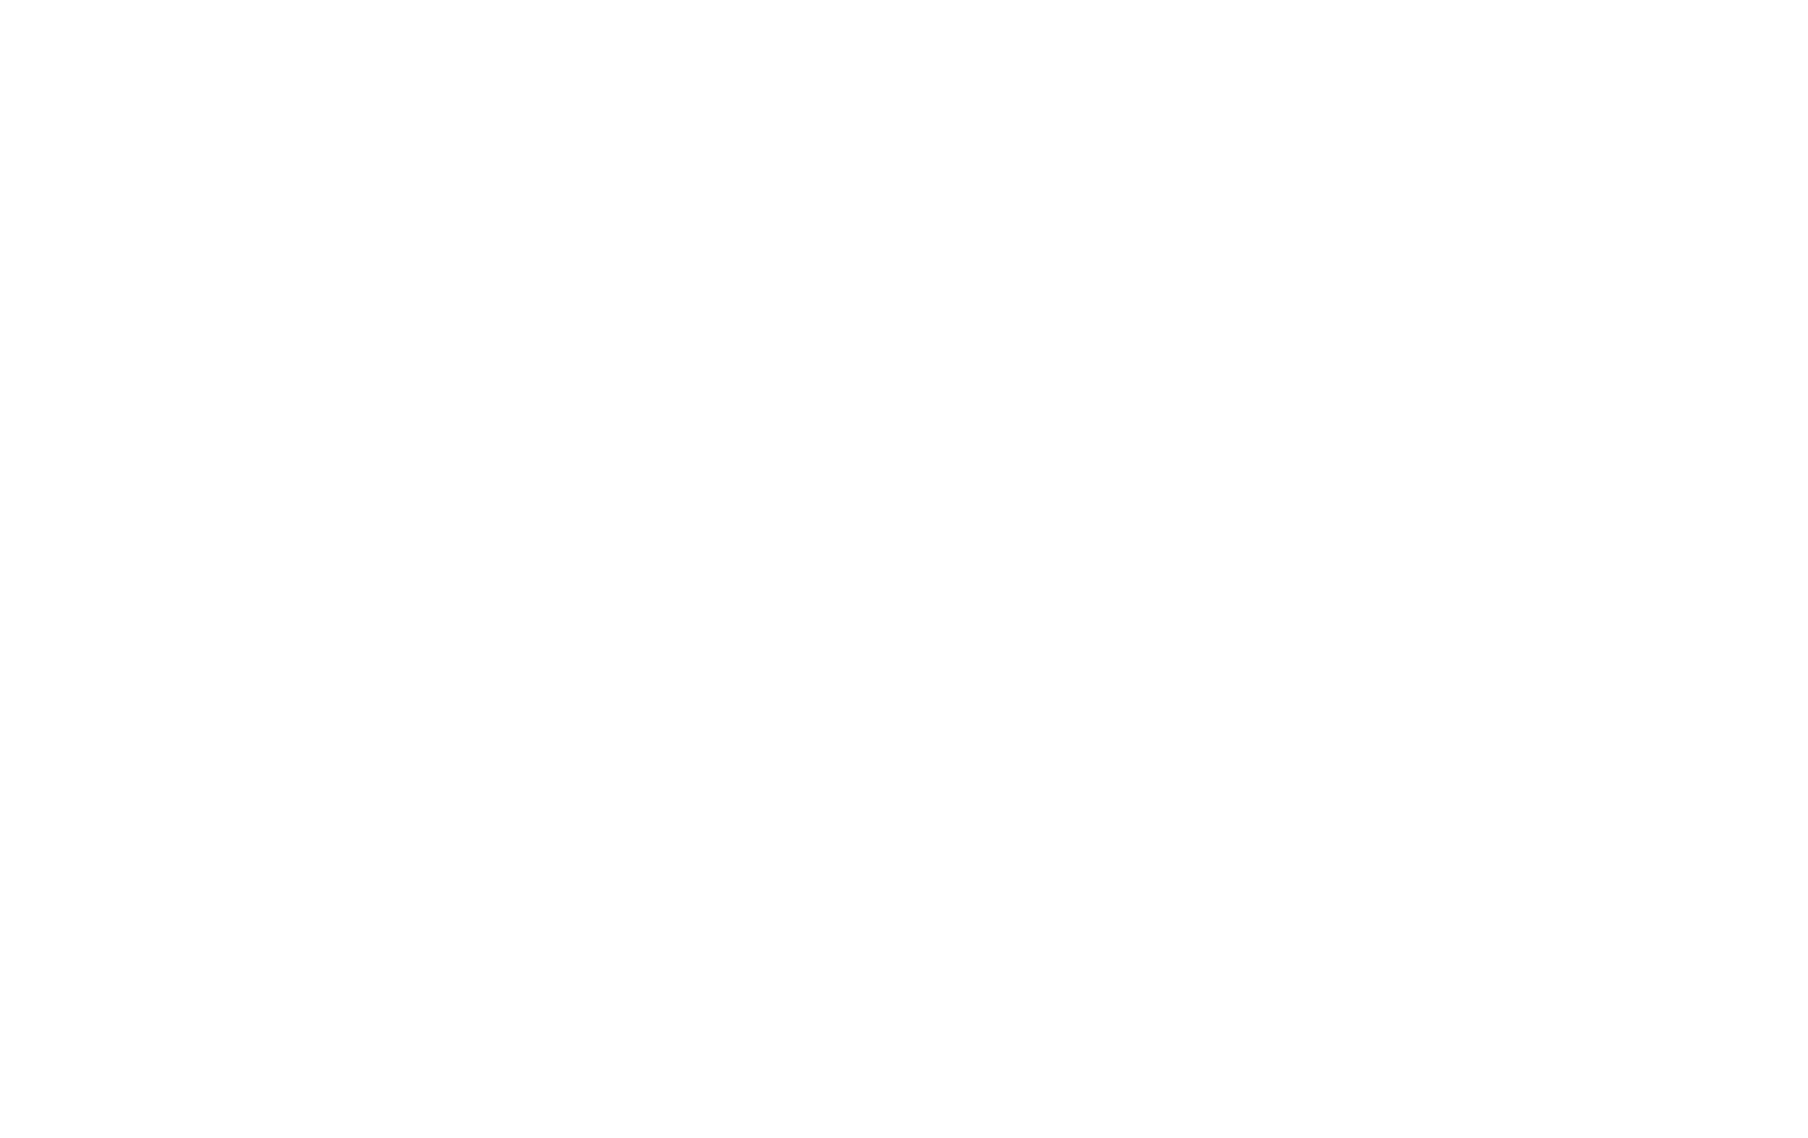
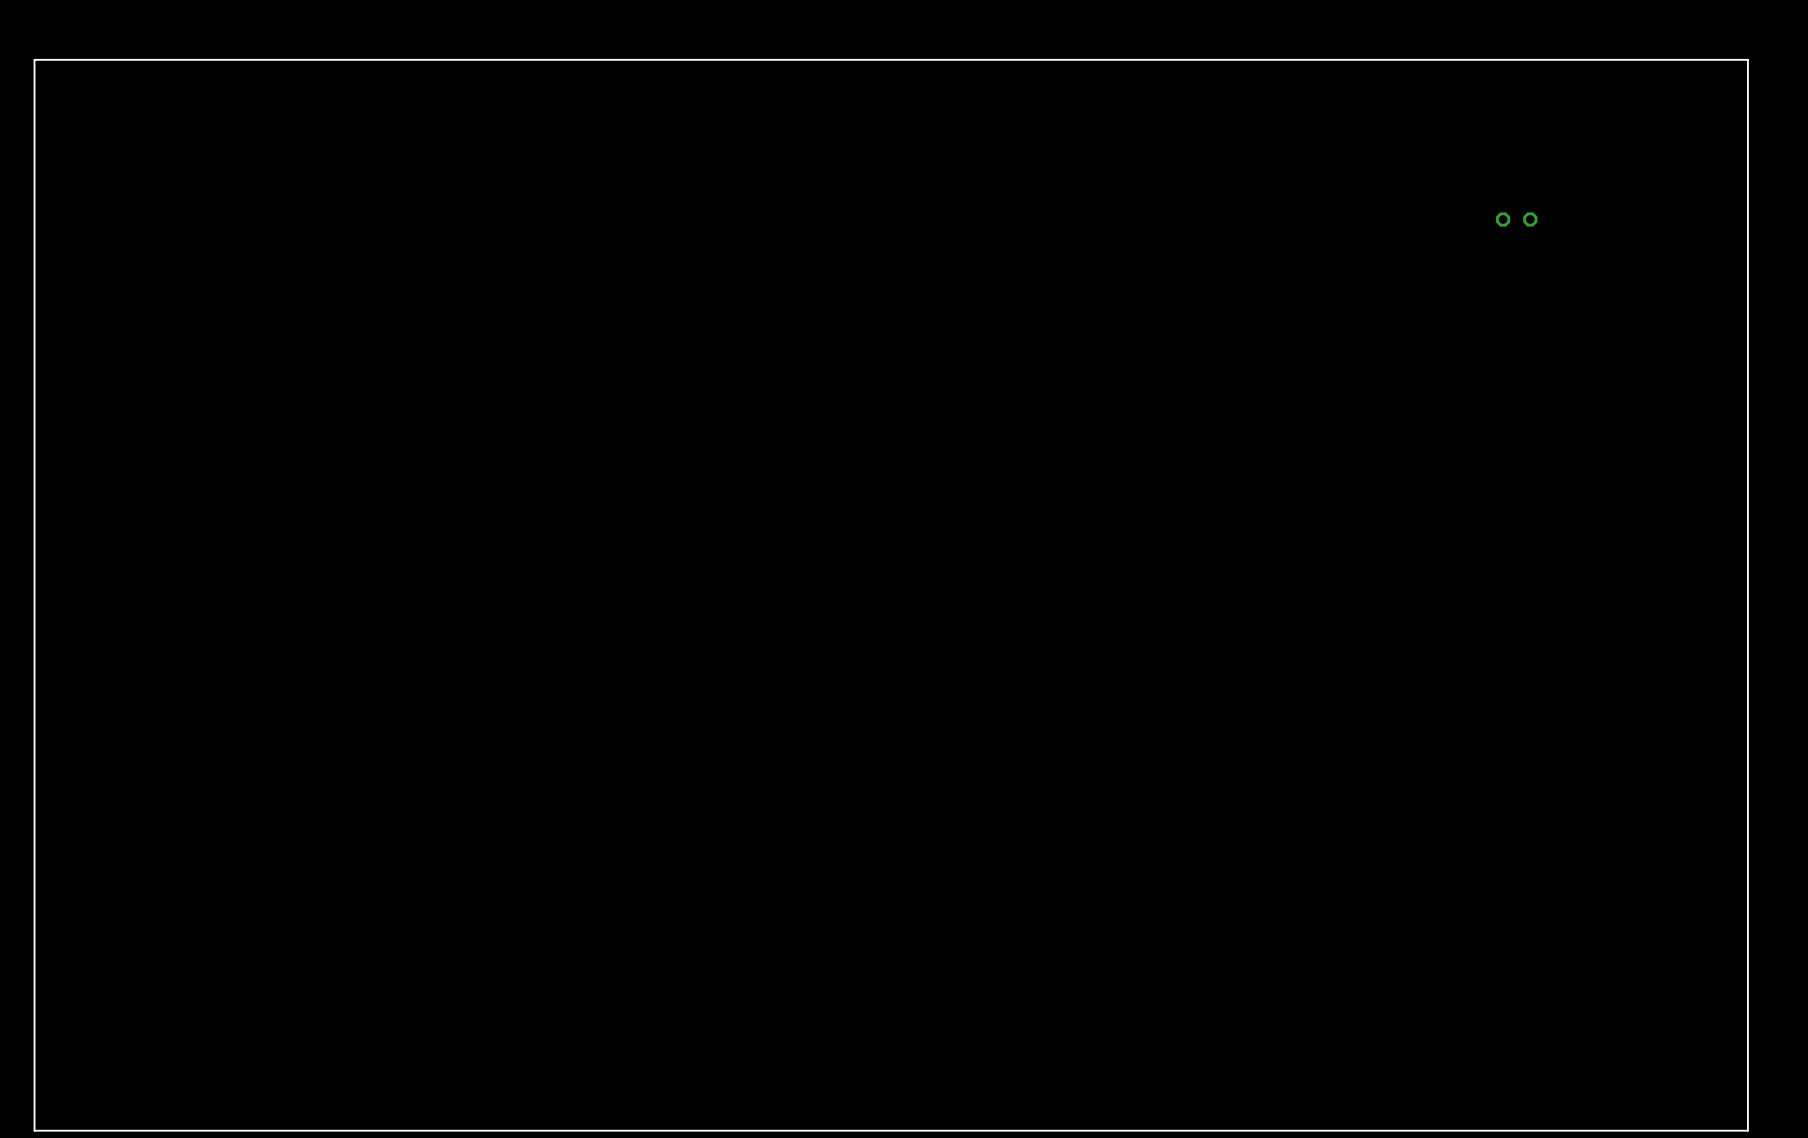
board edge: none -> (1747, 59) (34, 59) (34, 1130) (1747, 1130) (1747, 59)
part: none -> (1516, 219)

